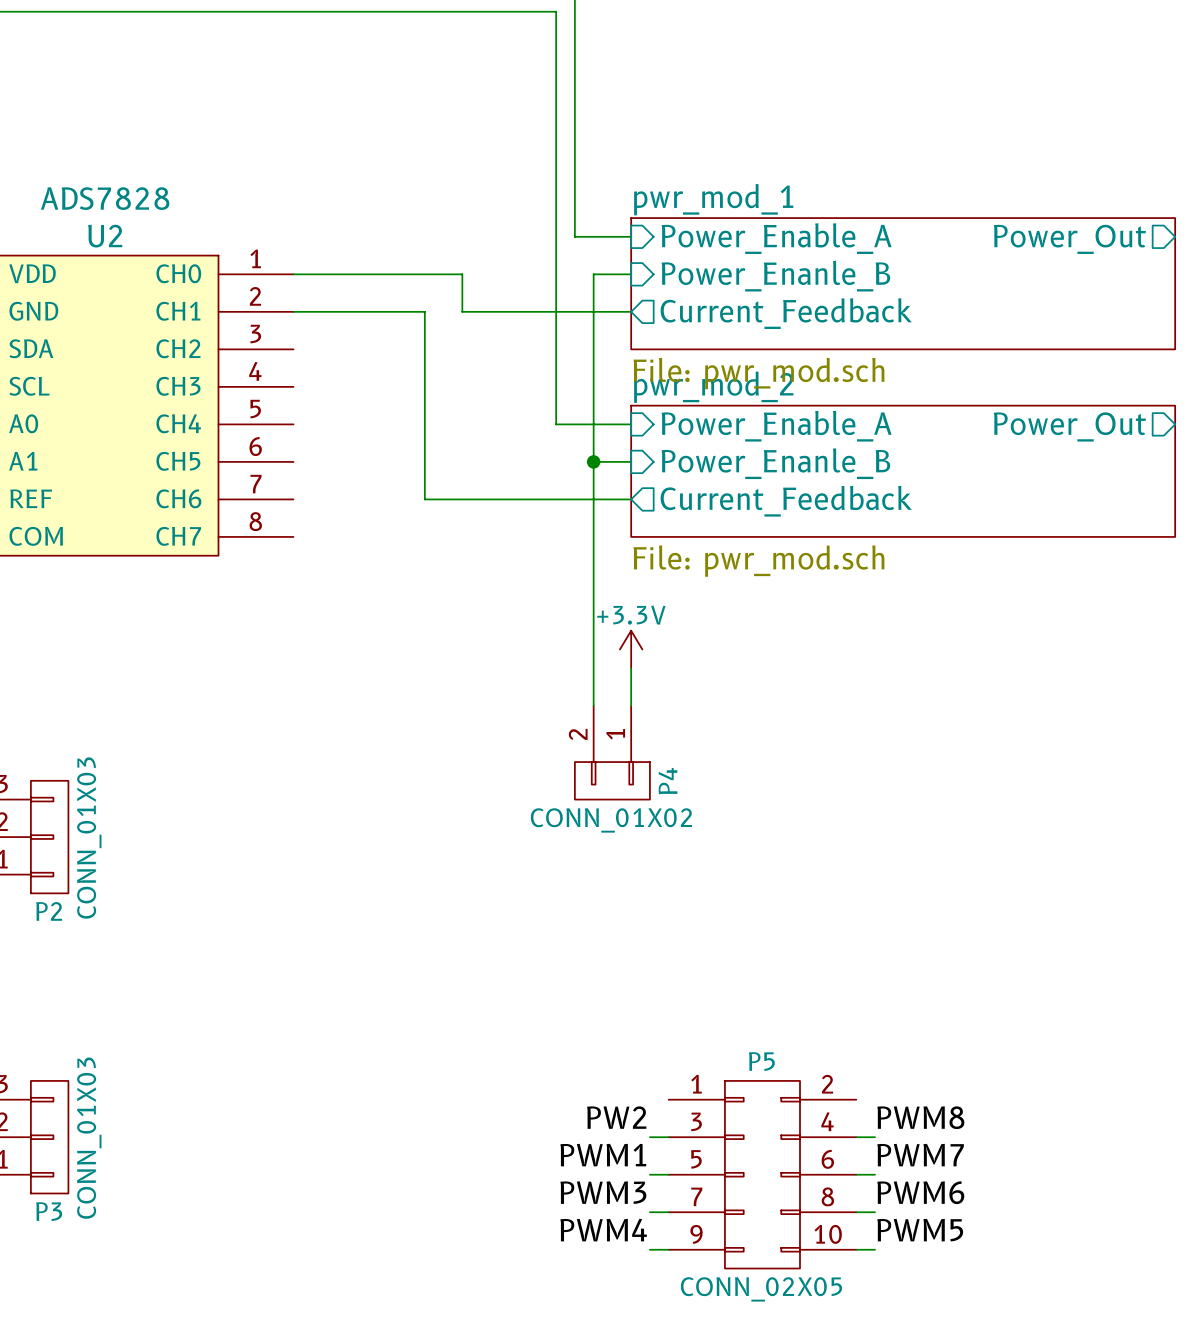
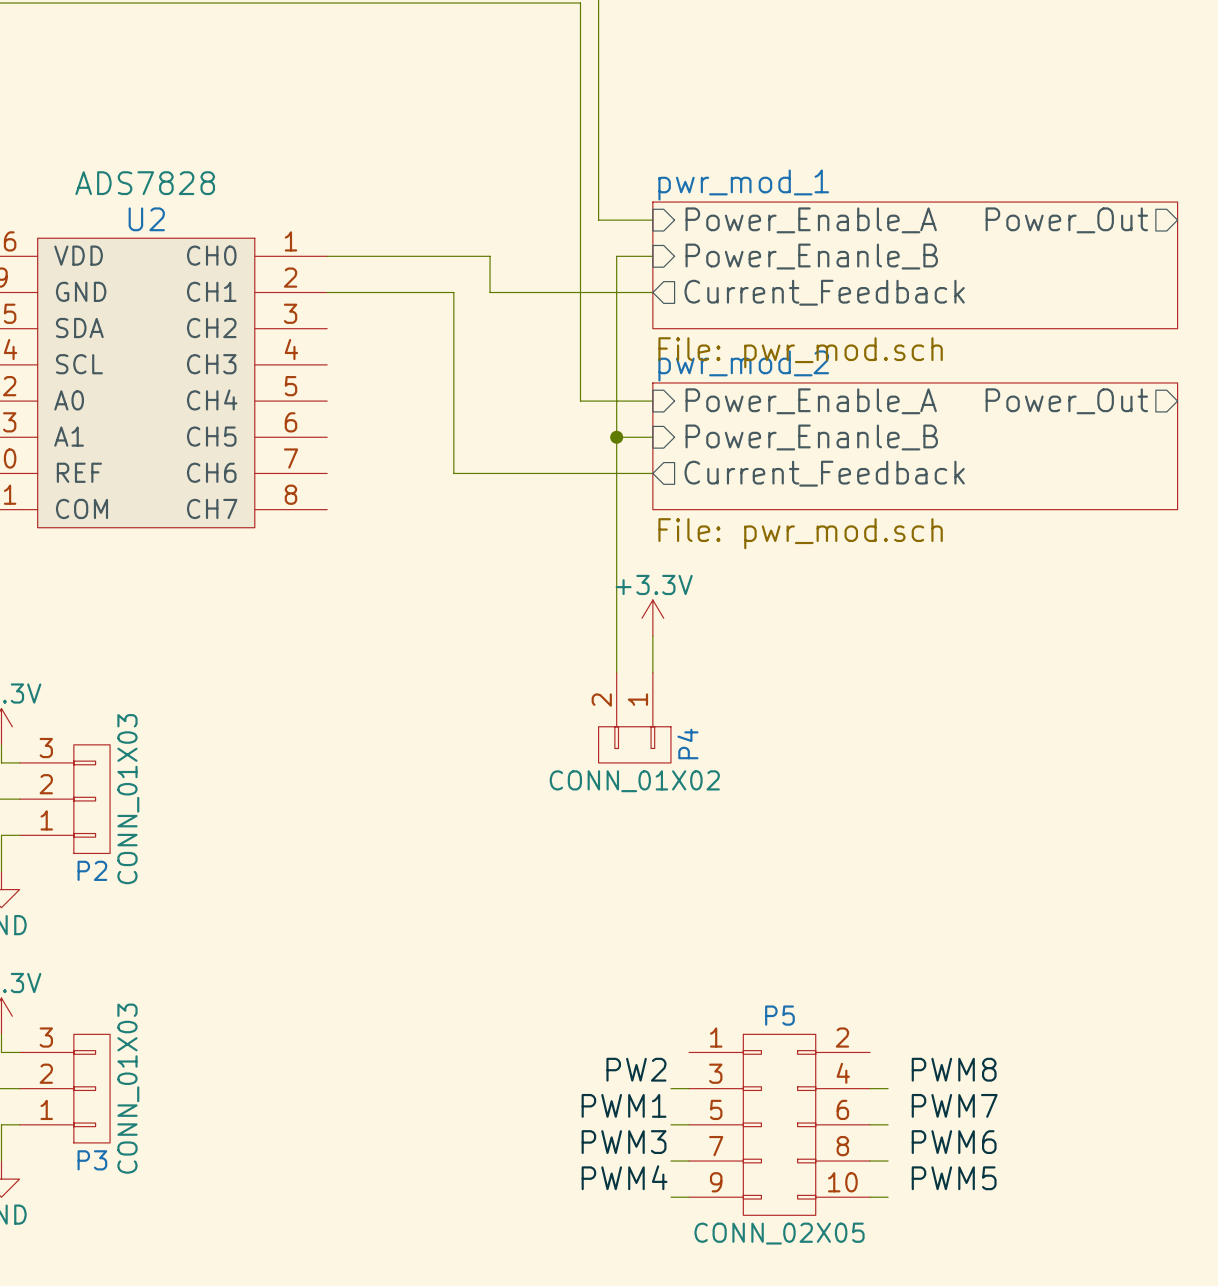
label position: PWM8 (920, 1117) -> PWM8 (954, 1069)
label position: PWM7 (920, 1155) -> PWM7 (954, 1105)
label position: PWM6 (920, 1192) -> PWM6 (954, 1142)
label position: PWM5 (920, 1230) -> PWM5 (954, 1178)

